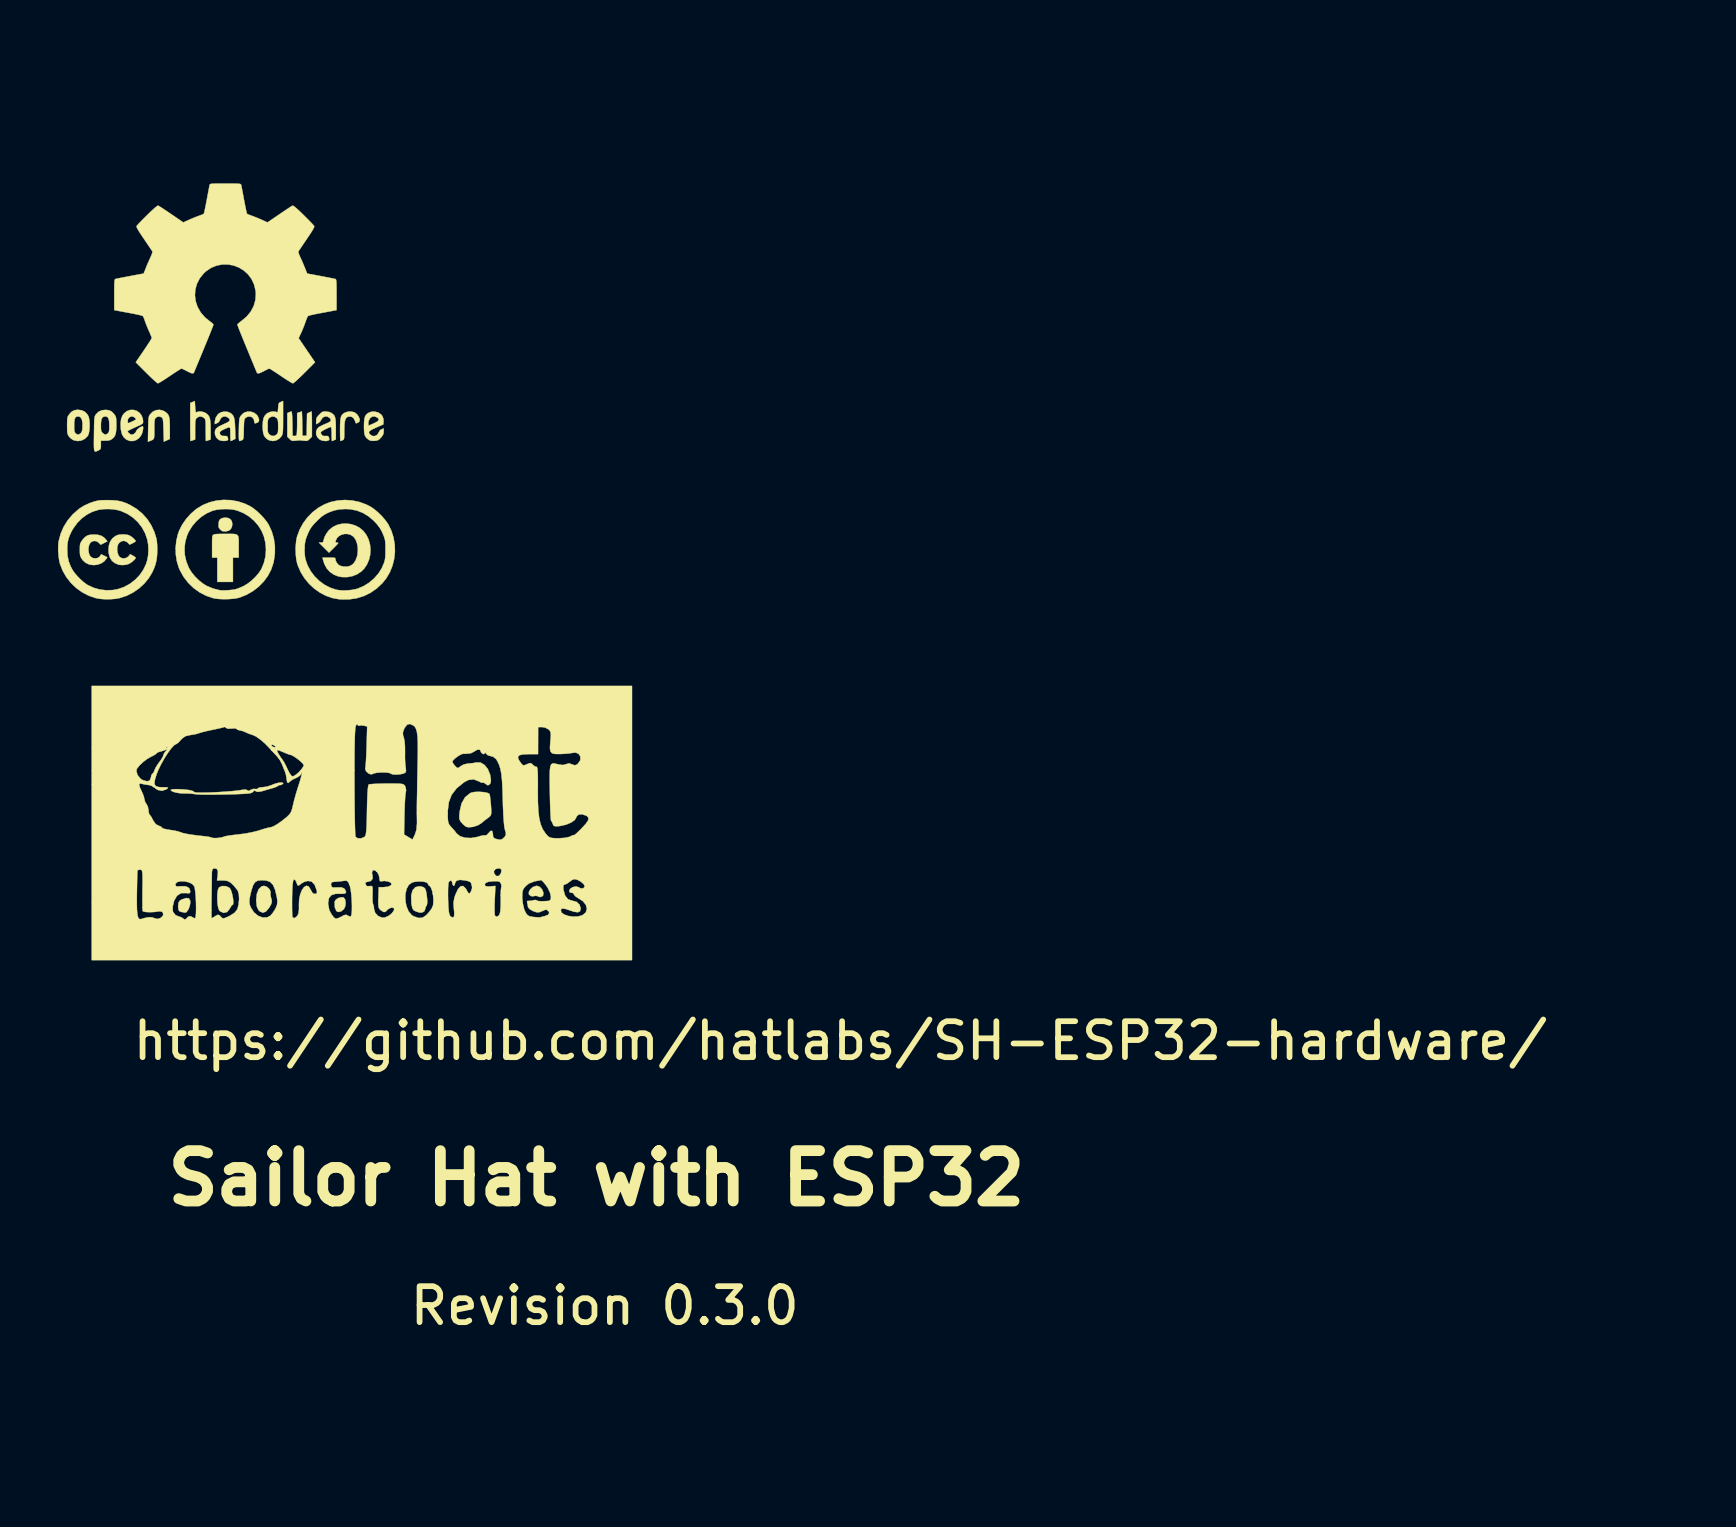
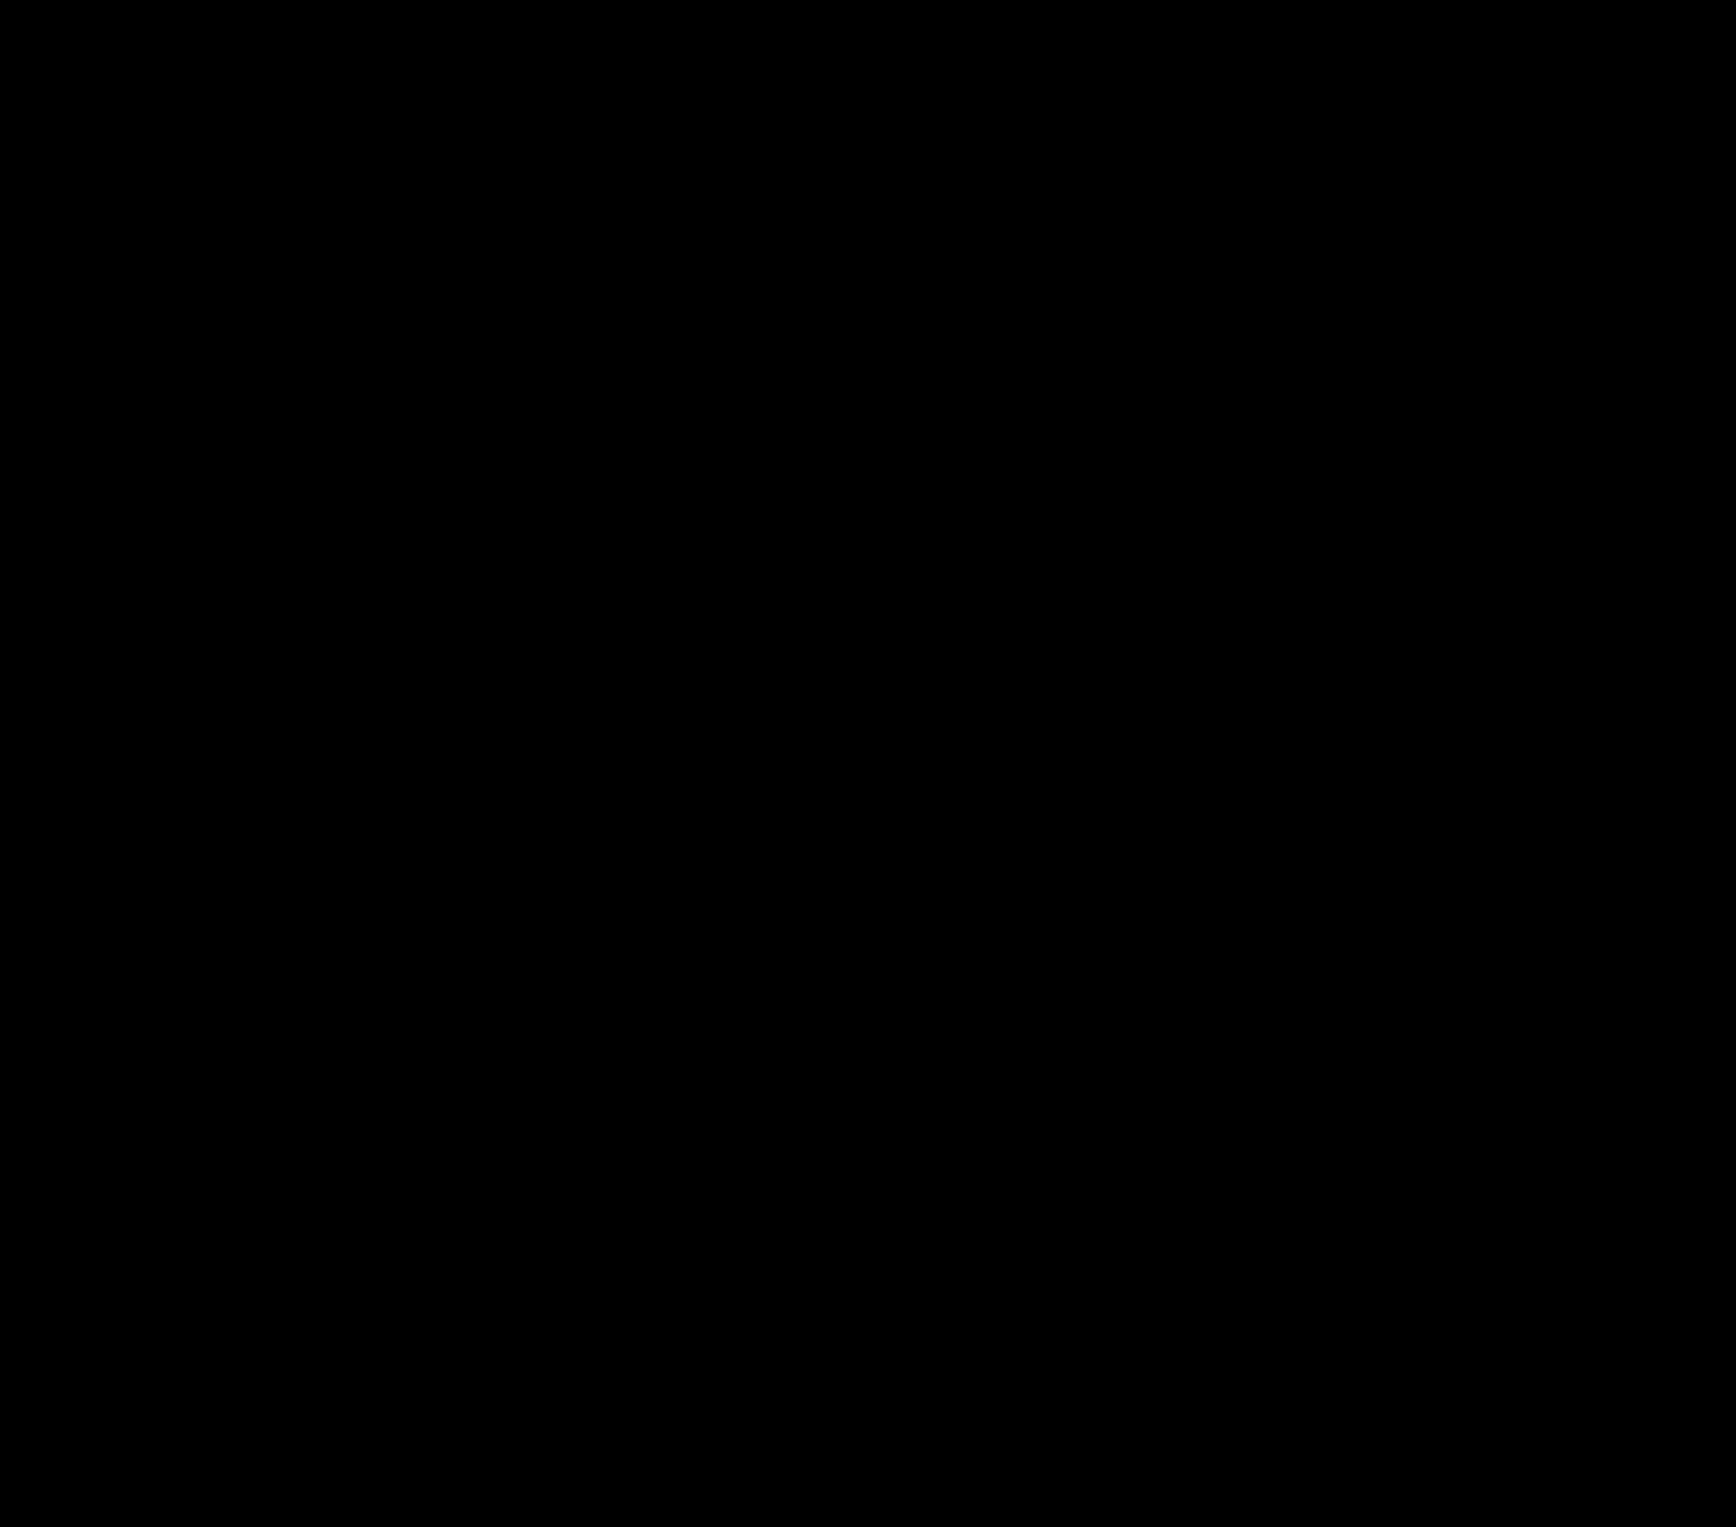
drawing: [66, 183, 384, 452] -> none
drawing: [58, 499, 396, 600] -> none
drawing: [91, 685, 633, 961] -> none
text: https://github.com/hatlabs/SH-ESP32-hardware/ (842, 1044) -> none
text: Sailor Hat with ESP32 (596, 1175) -> none
text: Revision 0.3.0 (605, 1304) -> none

